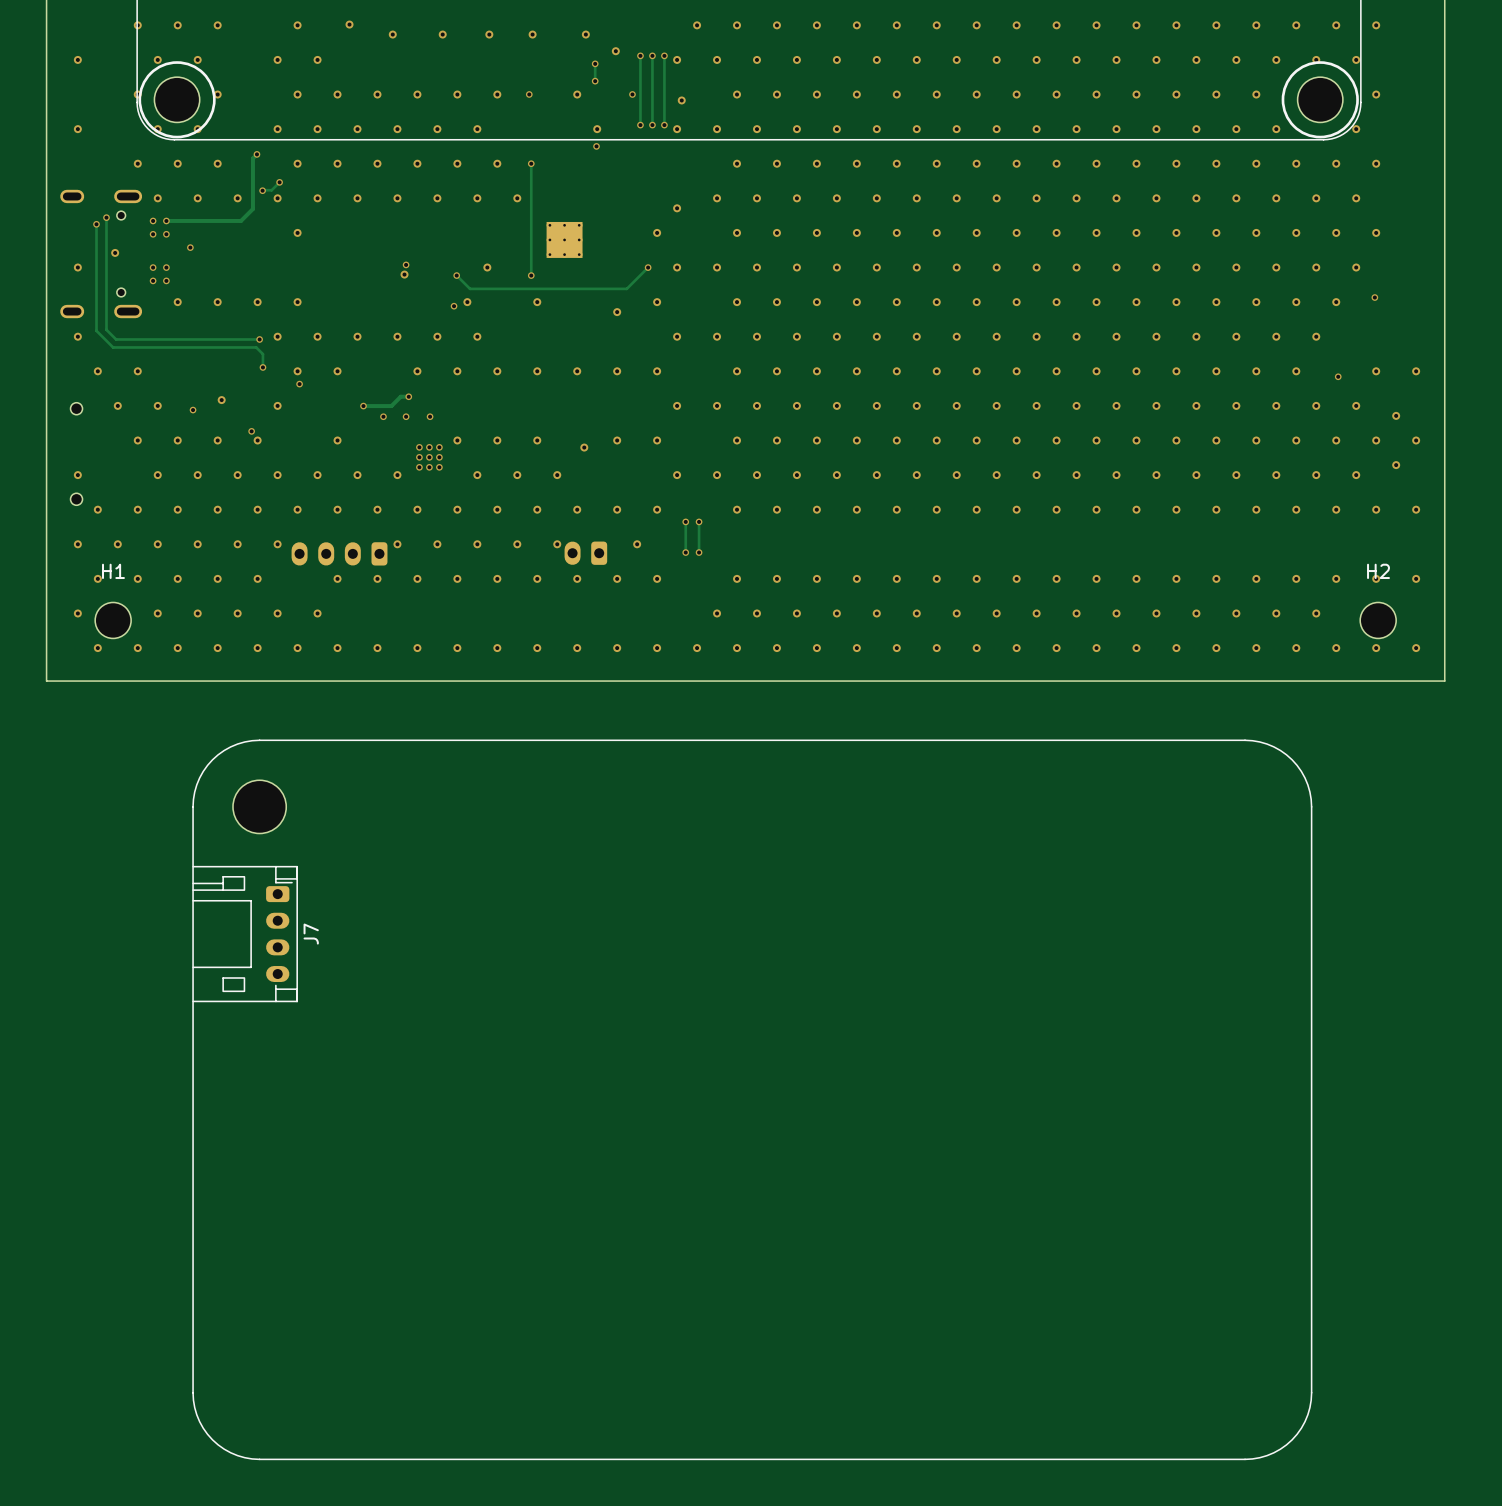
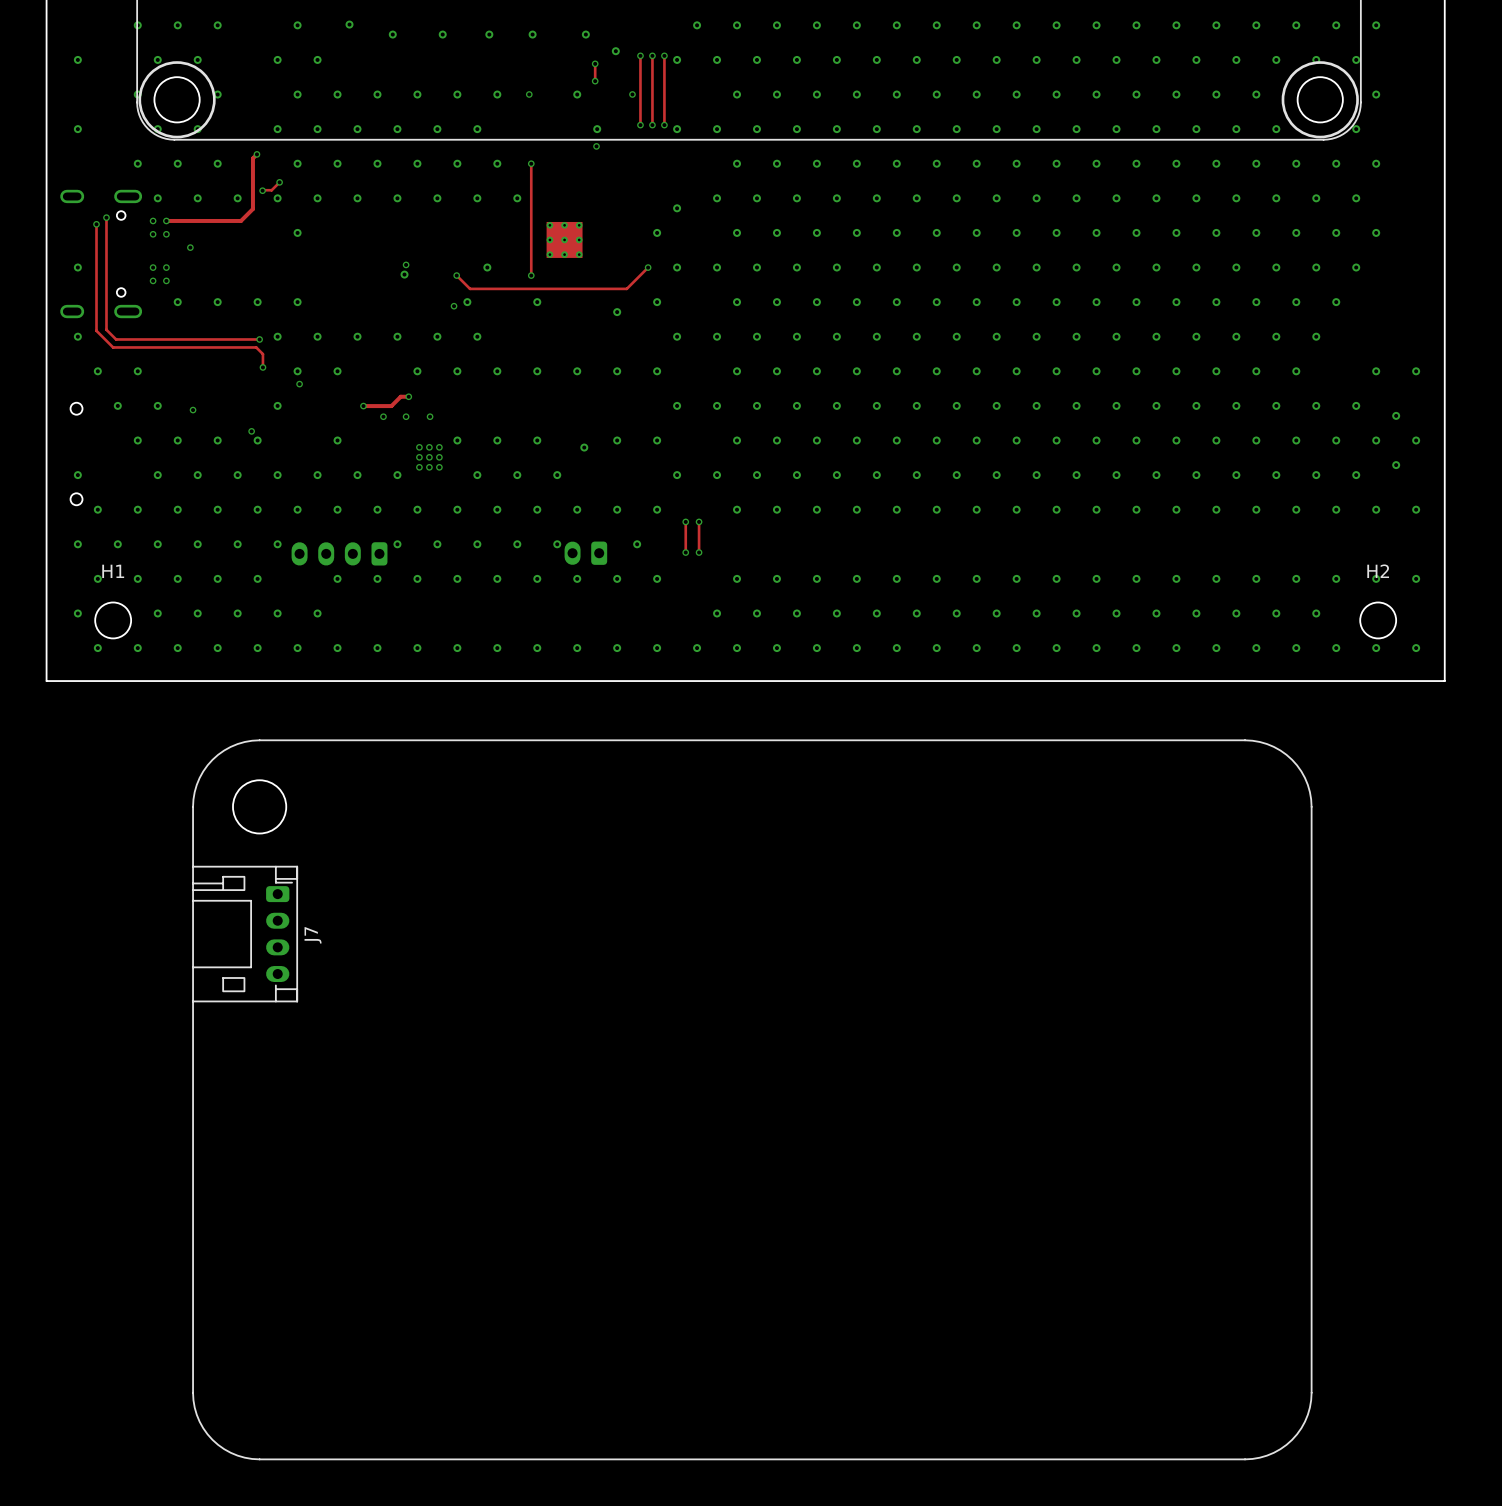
via: (681, 100) -> none
via: (115, 252) -> none
via: (1374, 297) -> none
via: (1338, 376) -> none
via: (221, 400) -> none

